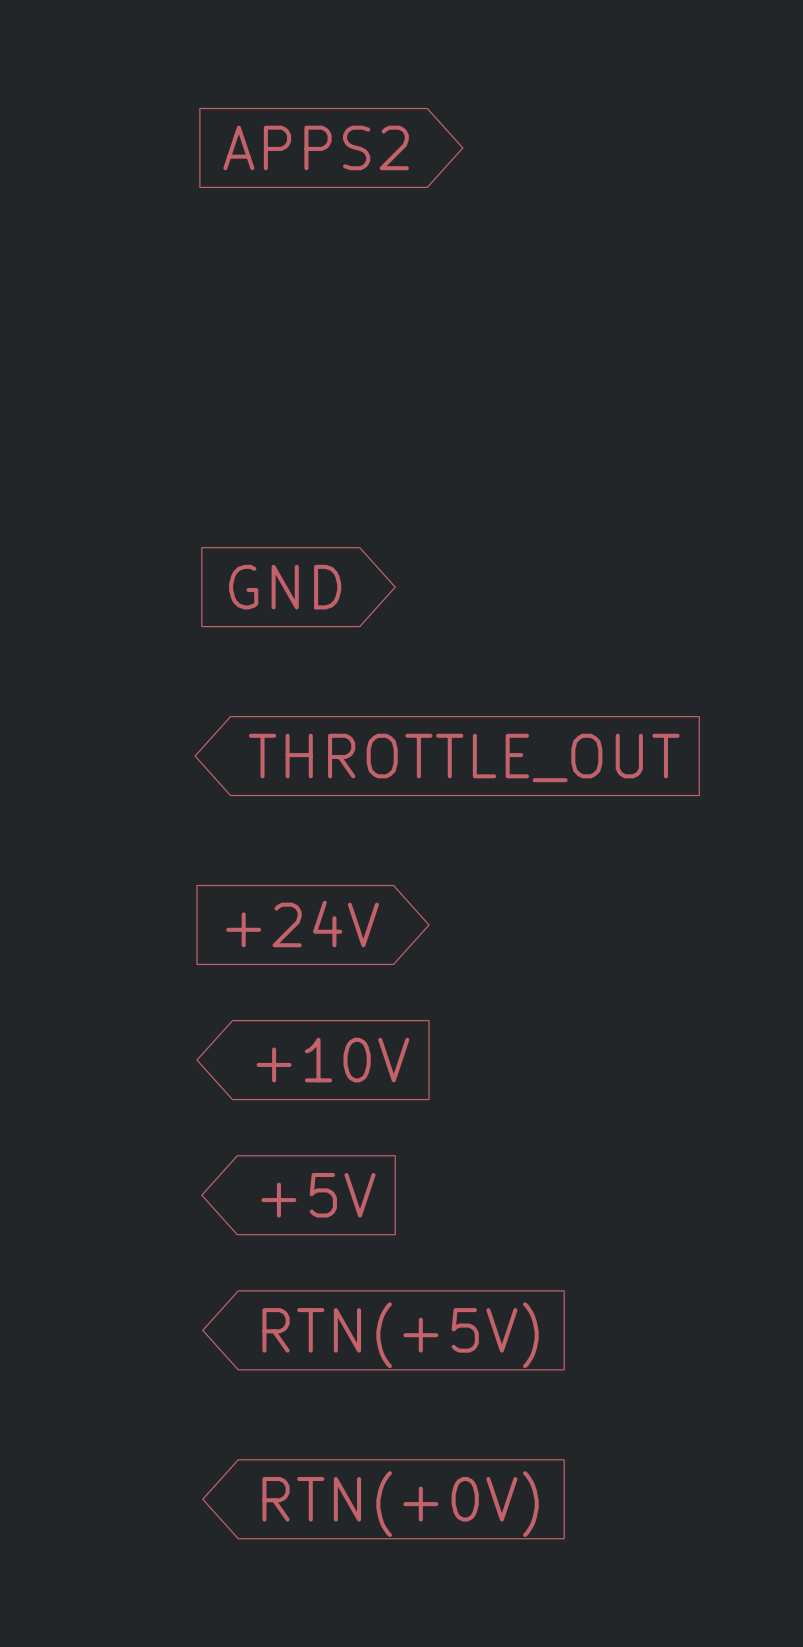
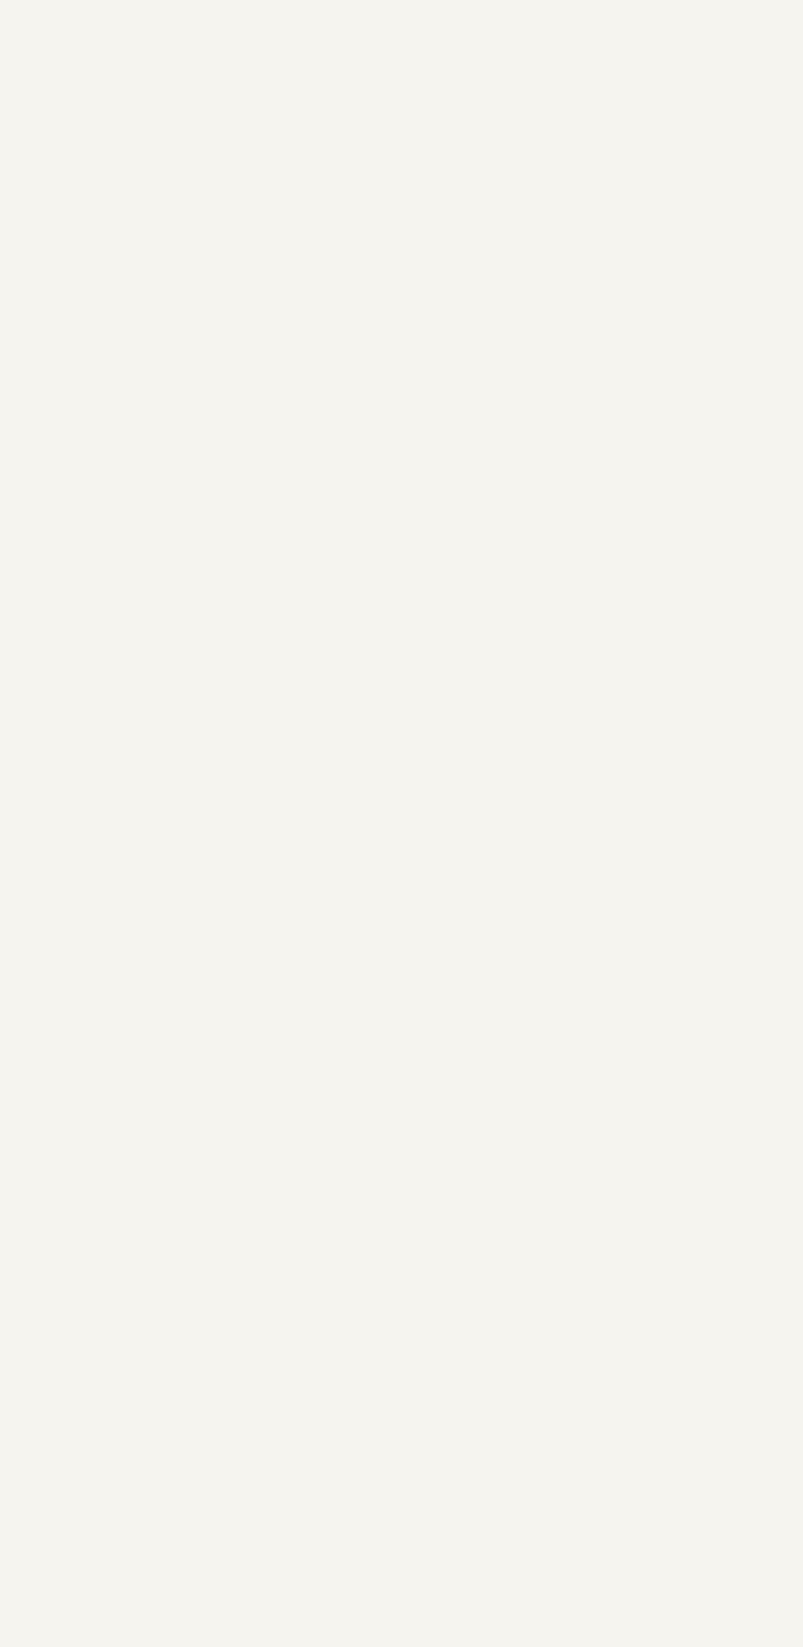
global label: APPS2 (316, 147) -> none
global label: GND (285, 587) -> none
global label: THROTTLE_OUT (464, 757) -> none
global label: +24V (302, 924) -> none
global label: +10V (332, 1060) -> none
global label: +5V (318, 1195) -> none
global label: RTN(+5V) (400, 1335) -> none
global label: RTN(+0V) (400, 1504) -> none

